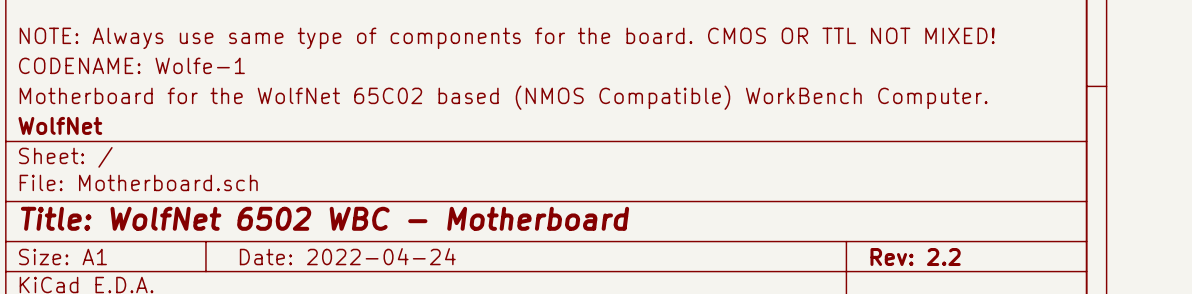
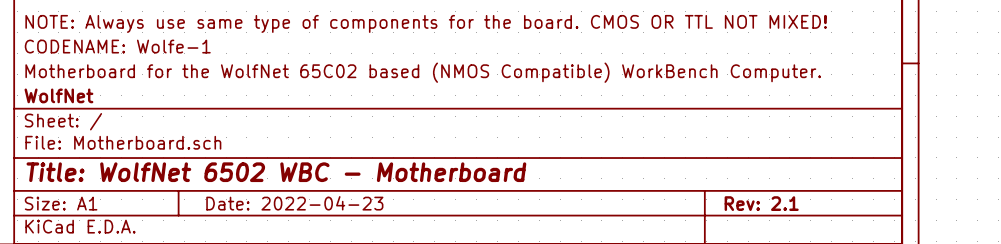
title block: Date: 2022-04-24 (347, 256) -> Date: 2022-04-23 (294, 203)
title block: Rev: 2.2 (915, 257) -> Rev: 2.1 (761, 203)

